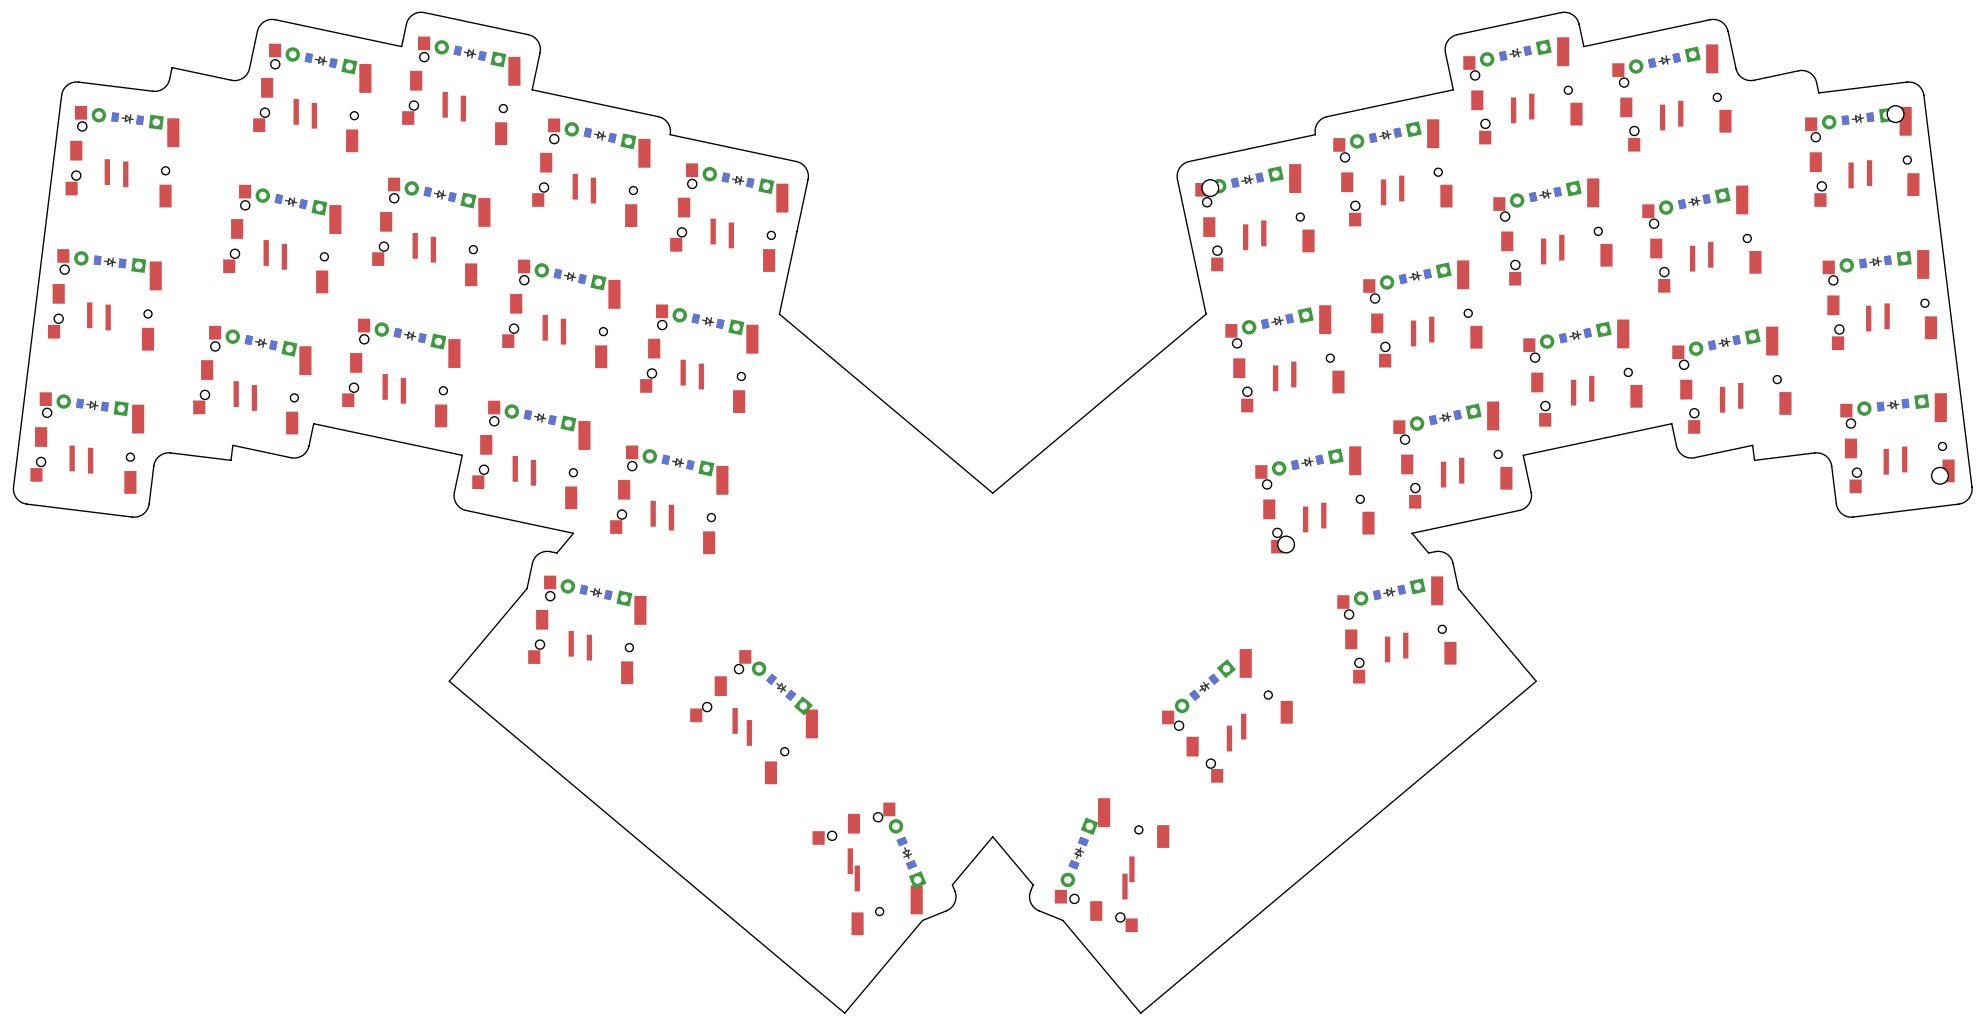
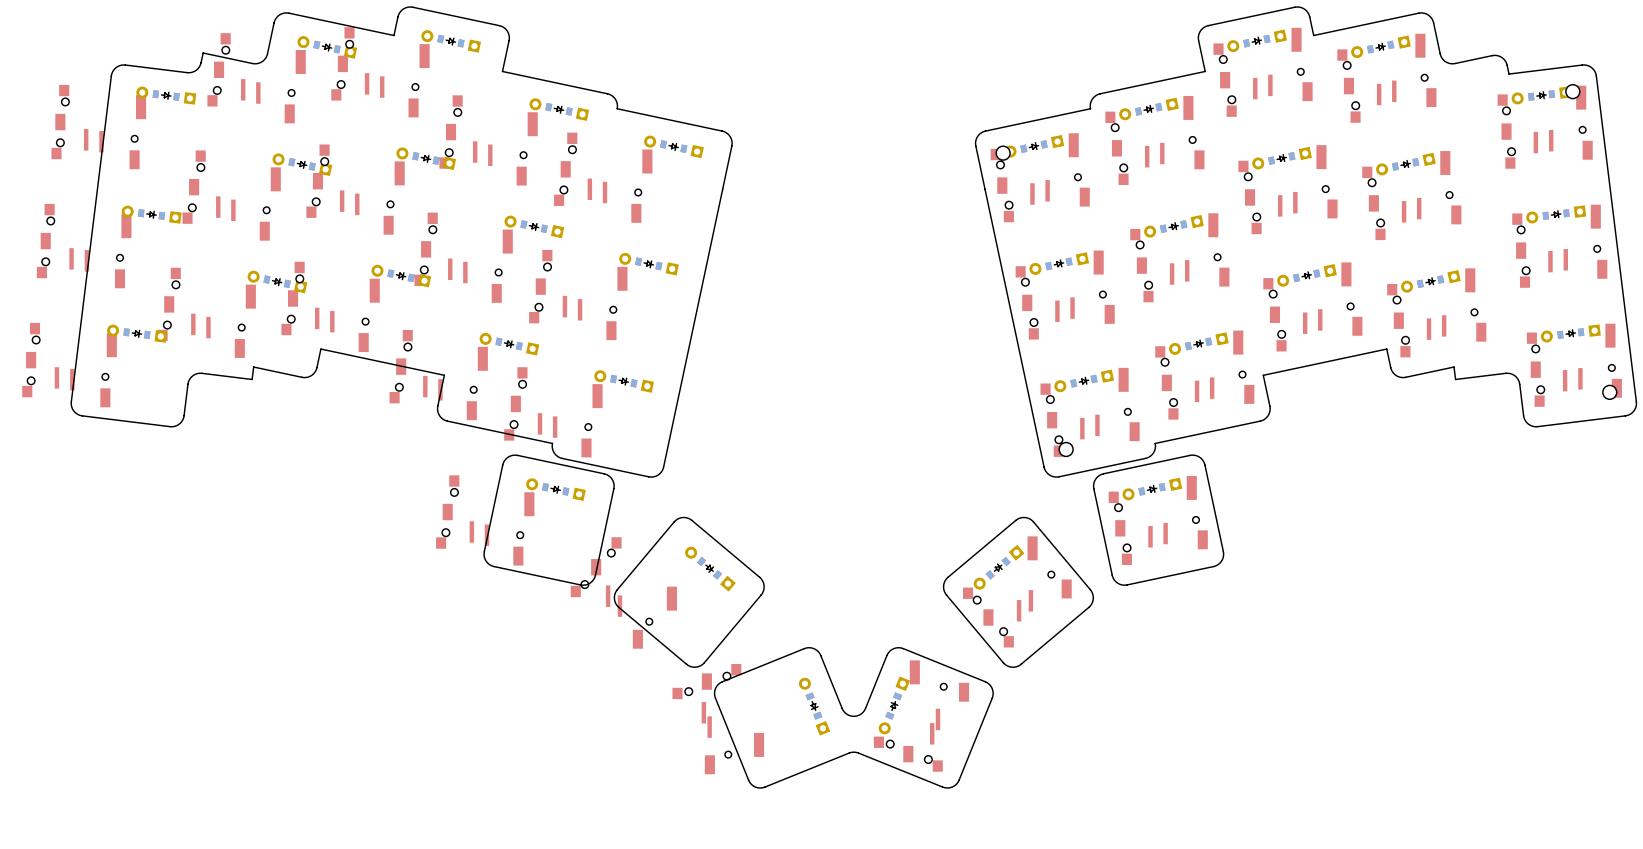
board edge: none -> (412, 7) (503, 27) (508, 32) (509, 38) (502, 71) (609, 94) (615, 99) (617, 108) (722, 131) (730, 137) (731, 146) (663, 467) (656, 475) (648, 476) (562, 458) (554, 452) (552, 443) (445, 420) (439, 415) (437, 409) (444, 375) (320, 349) (315, 370) (306, 377) (253, 367) (252, 379) (202, 373) (195, 374) (188, 382) (183, 418) (180, 423) (174, 426) (82, 415) (77, 413) (72, 408) (71, 401) (111, 76) (113, 69) (123, 64) (191, 72) (199, 67) (203, 53) (252, 63) (259, 63) (267, 55) (275, 19) (284, 13) (394, 35) (399, 12) (406, 7) (412, 7)
part: (470, 53) -> none
part: none -> (451, 41)
part: (321, 60) -> none
part: none -> (327, 47)
part position: (127, 118) -> (166, 95)
part: (600, 135) -> none
part: none -> (559, 109)
part: (738, 180) -> none
part: none -> (673, 146)
part position: (440, 194) -> (426, 158)
part: (291, 201) -> none
part: none -> (302, 164)
part position: (110, 262) -> (151, 214)
part: (570, 276) -> none
part: none -> (534, 226)
board edge: (1206, 314) (992, 493) (779, 314) (808, 179) (807, 172) (803, 165) (796, 161) (670, 134) (668, 123) (658, 116) (532, 89) (540, 48) (537, 41) (530, 35) (420, 12) (412, 14) (407, 20) (401, 46) (269, 19) (263, 21) (258, 27) (249, 70) (245, 75) (239, 79) (231, 80) (172, 67) (167, 84) (158, 90) (76, 82) (67, 85) (62, 93) (13, 487) (14, 495) (19, 500) (26, 504) (137, 516) (144, 512) (148, 507) (154, 464) (157, 458) (162, 454) (170, 452) (231, 460) (232, 445) (296, 457) (304, 454) (307, 449) (313, 423) (462, 455) (454, 494) (455, 502) (460, 508) (573, 533) (556, 553) (544, 551) (536, 556) (532, 563) (527, 588) (449, 681) (844, 1013) (922, 920) (952, 906) (955, 897) (952, 884) (992, 836) (1033, 884) (1029, 899) (1032, 905) (1039, 910) -> (999, 257) (1044, 467) (1047, 472) (1052, 476) (1059, 476) (1145, 458) (1153, 452) (1155, 443) (1170, 440)
part: (708, 321) -> none
part: none -> (649, 264)
part: (410, 335) -> none
part: none -> (401, 276)
part: (261, 343) -> none
part: none -> (277, 282)
part position: (92, 405) -> (137, 333)
part: (540, 417) -> none
part: none -> (509, 344)
part: (678, 462) -> none
part: none -> (624, 381)
board edge: (1412, 533) (1428, 553) -> (1209, 486) (1223, 552) (1219, 563) (1213, 566) (1127, 584) (1121, 584) (1115, 581) (1112, 575) (1093, 488) (1094, 480) (1103, 473) (1184, 456)
board edge: none -> (517, 455) (604, 473) (612, 480) (613, 488) (595, 575) (588, 583) (580, 584) (494, 566) (485, 559) (484, 551) (503, 463) (509, 456) (517, 455)
board edge: (1458, 588) (1536, 681) (1140, 1013) (1062, 920) -> (860, 753) (850, 752) (765, 787) (755, 786) (748, 780) (715, 698) (715, 688) (722, 681) (808, 647) (814, 648) (819, 653) (842, 709) (850, 715) (858, 715) (864, 711) (887, 654) (895, 648) (903, 648) (985, 681) (990, 686) (993, 692) (992, 698) (959, 780) (955, 785) (944, 787) (880, 762)
part: (596, 592) -> none
part: none -> (555, 489)
board edge: none -> (691, 520) (759, 577) (764, 587) (761, 595) (704, 662) (694, 667) (686, 664) (618, 607) (614, 597) (617, 589) (675, 520) (684, 517) (691, 520)
board edge: none -> (1015, 520) (948, 577) (943, 587) (946, 595) (1003, 662) (1013, 667) (1021, 664) (1088, 607) (1093, 597) (1090, 589) (1032, 520) (1023, 517) (1015, 520)
part position: (782, 688) -> (710, 569)
part position: (907, 853) -> (814, 706)

